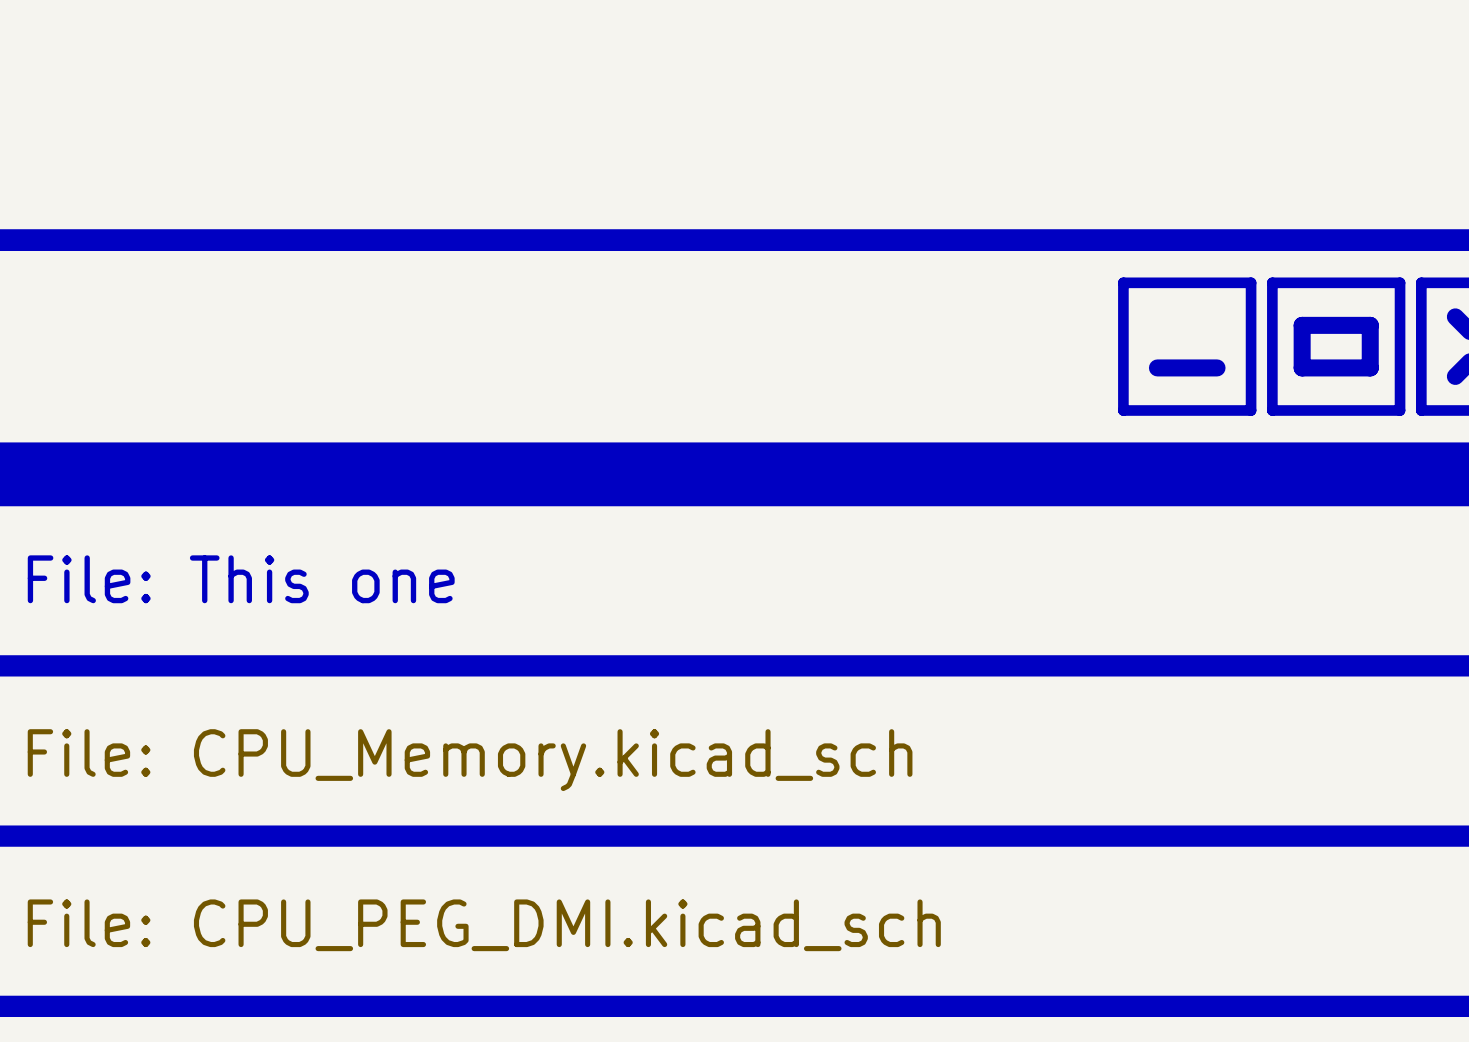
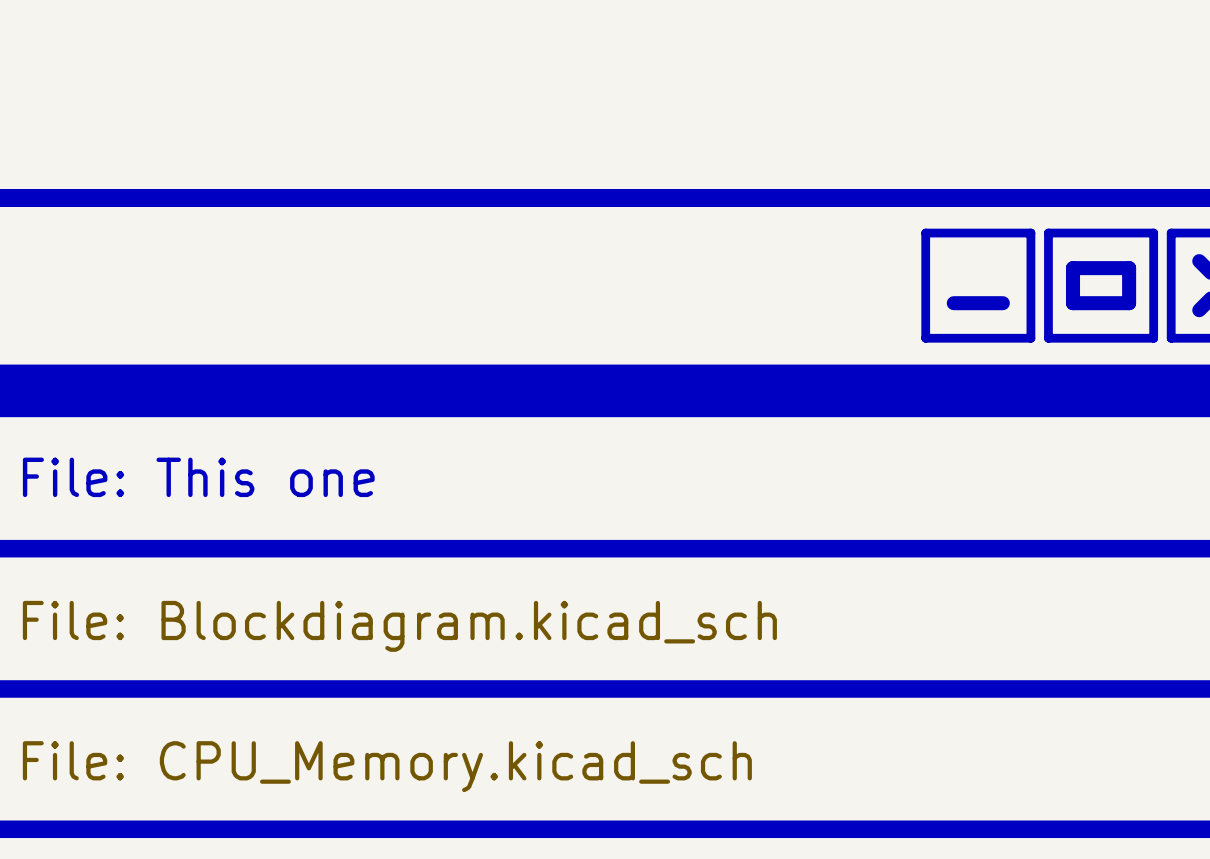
sheet value: File: CPU_Memory.kicad_sch (470, 760) -> File: Blockdiagram.kicad_sch (399, 626)
sheet value: File: CPU_PEG_DMI.kicad_sch (484, 925) -> File: CPU_Memory.kicad_sch (387, 766)

